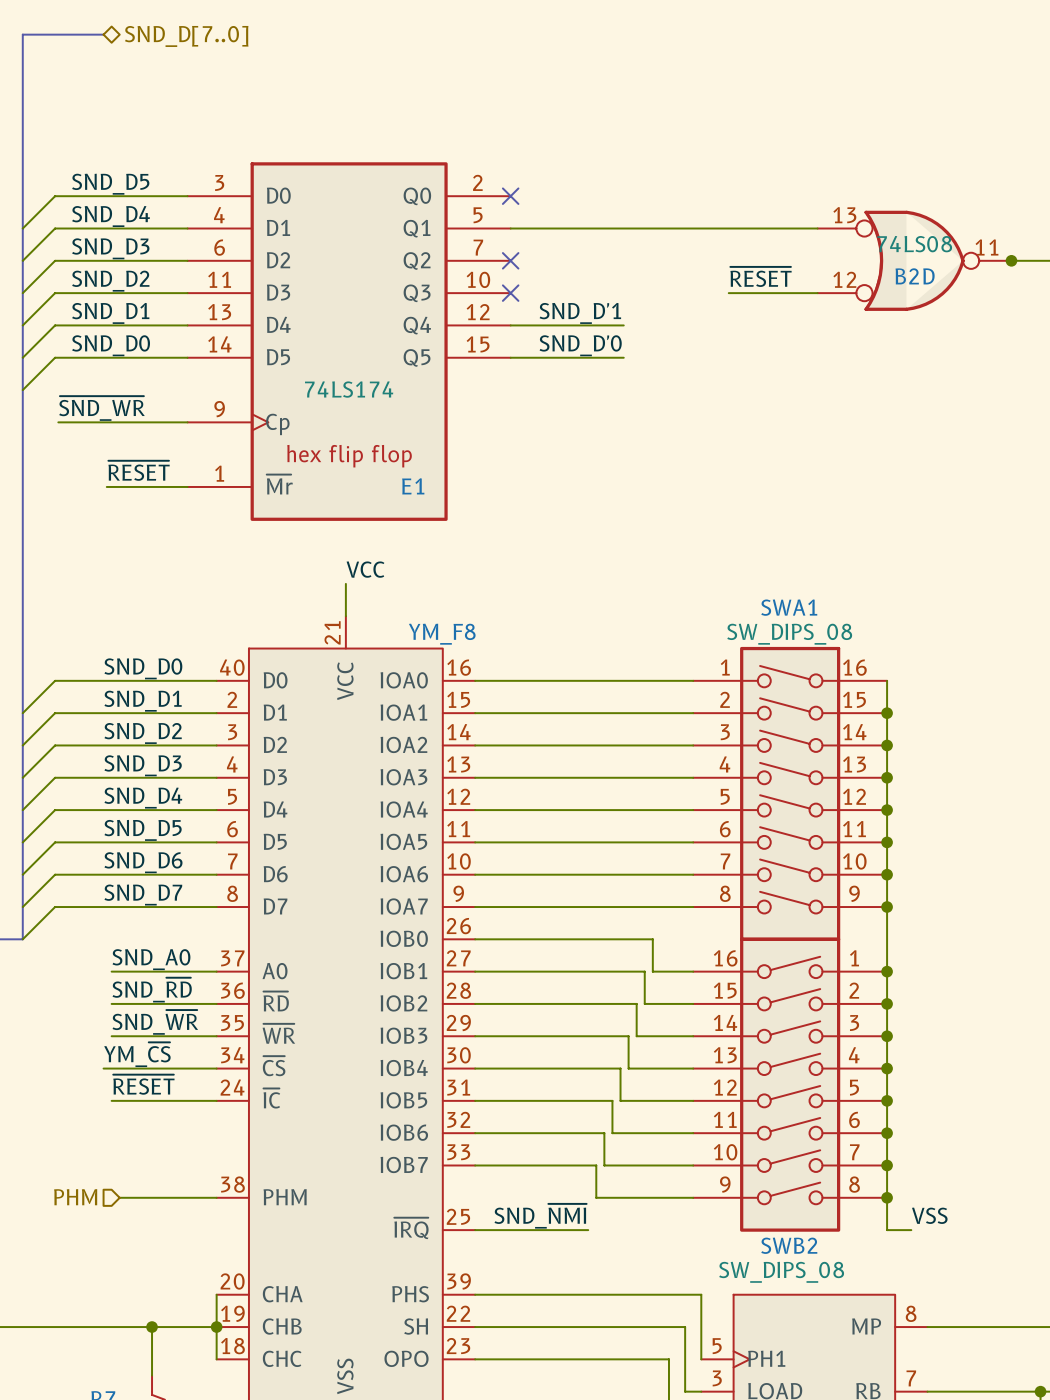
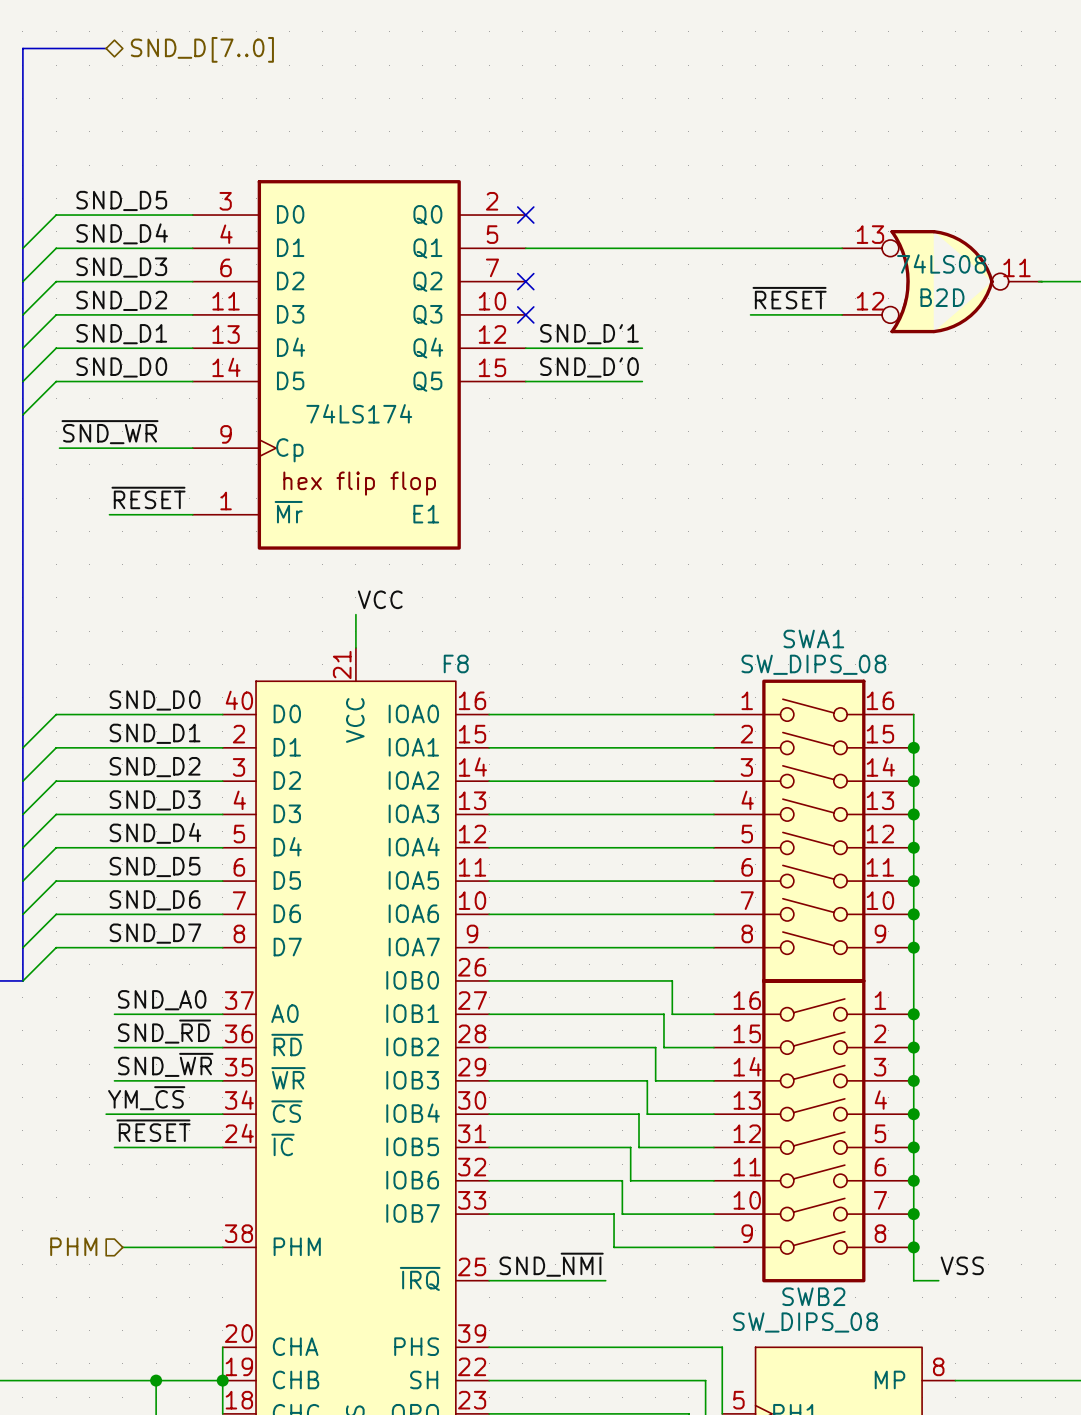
junction: (1011, 260) -> none
YM_F8 name: YM_F8 (442, 634) -> F8 (456, 663)

